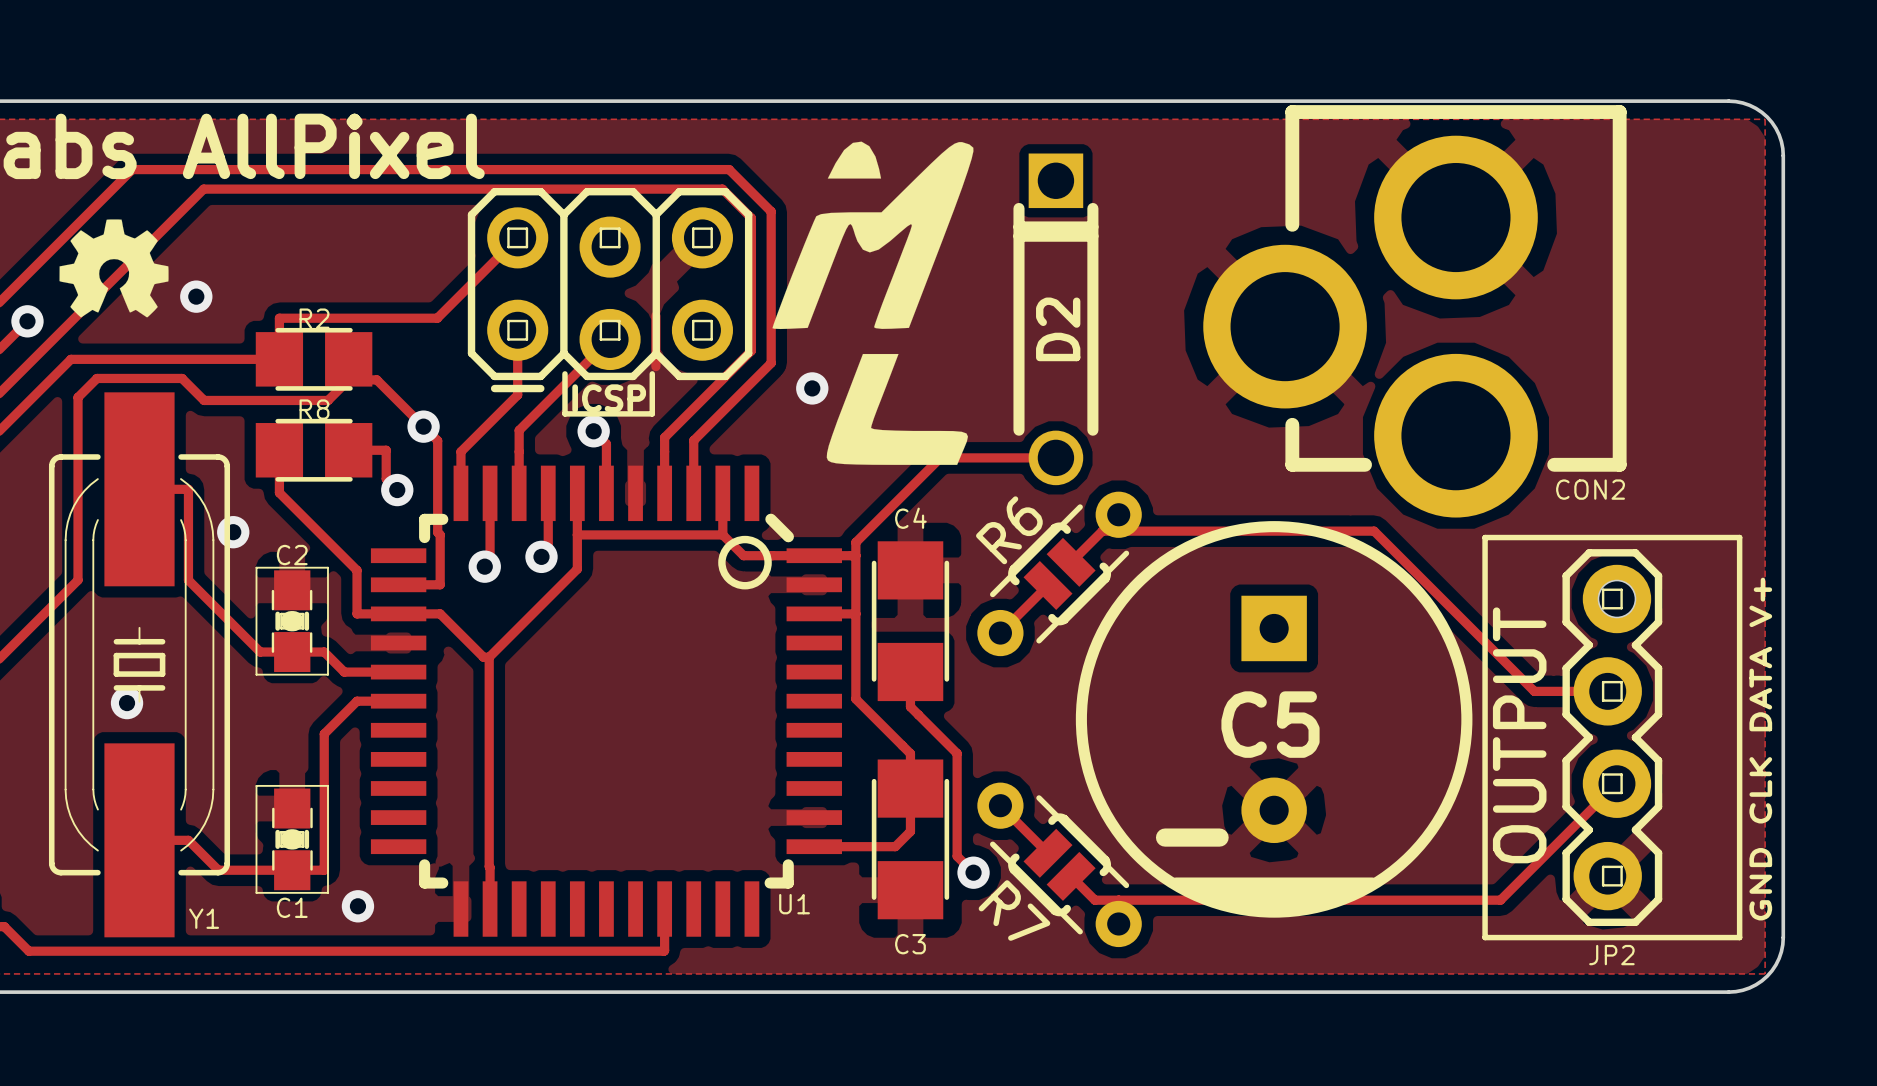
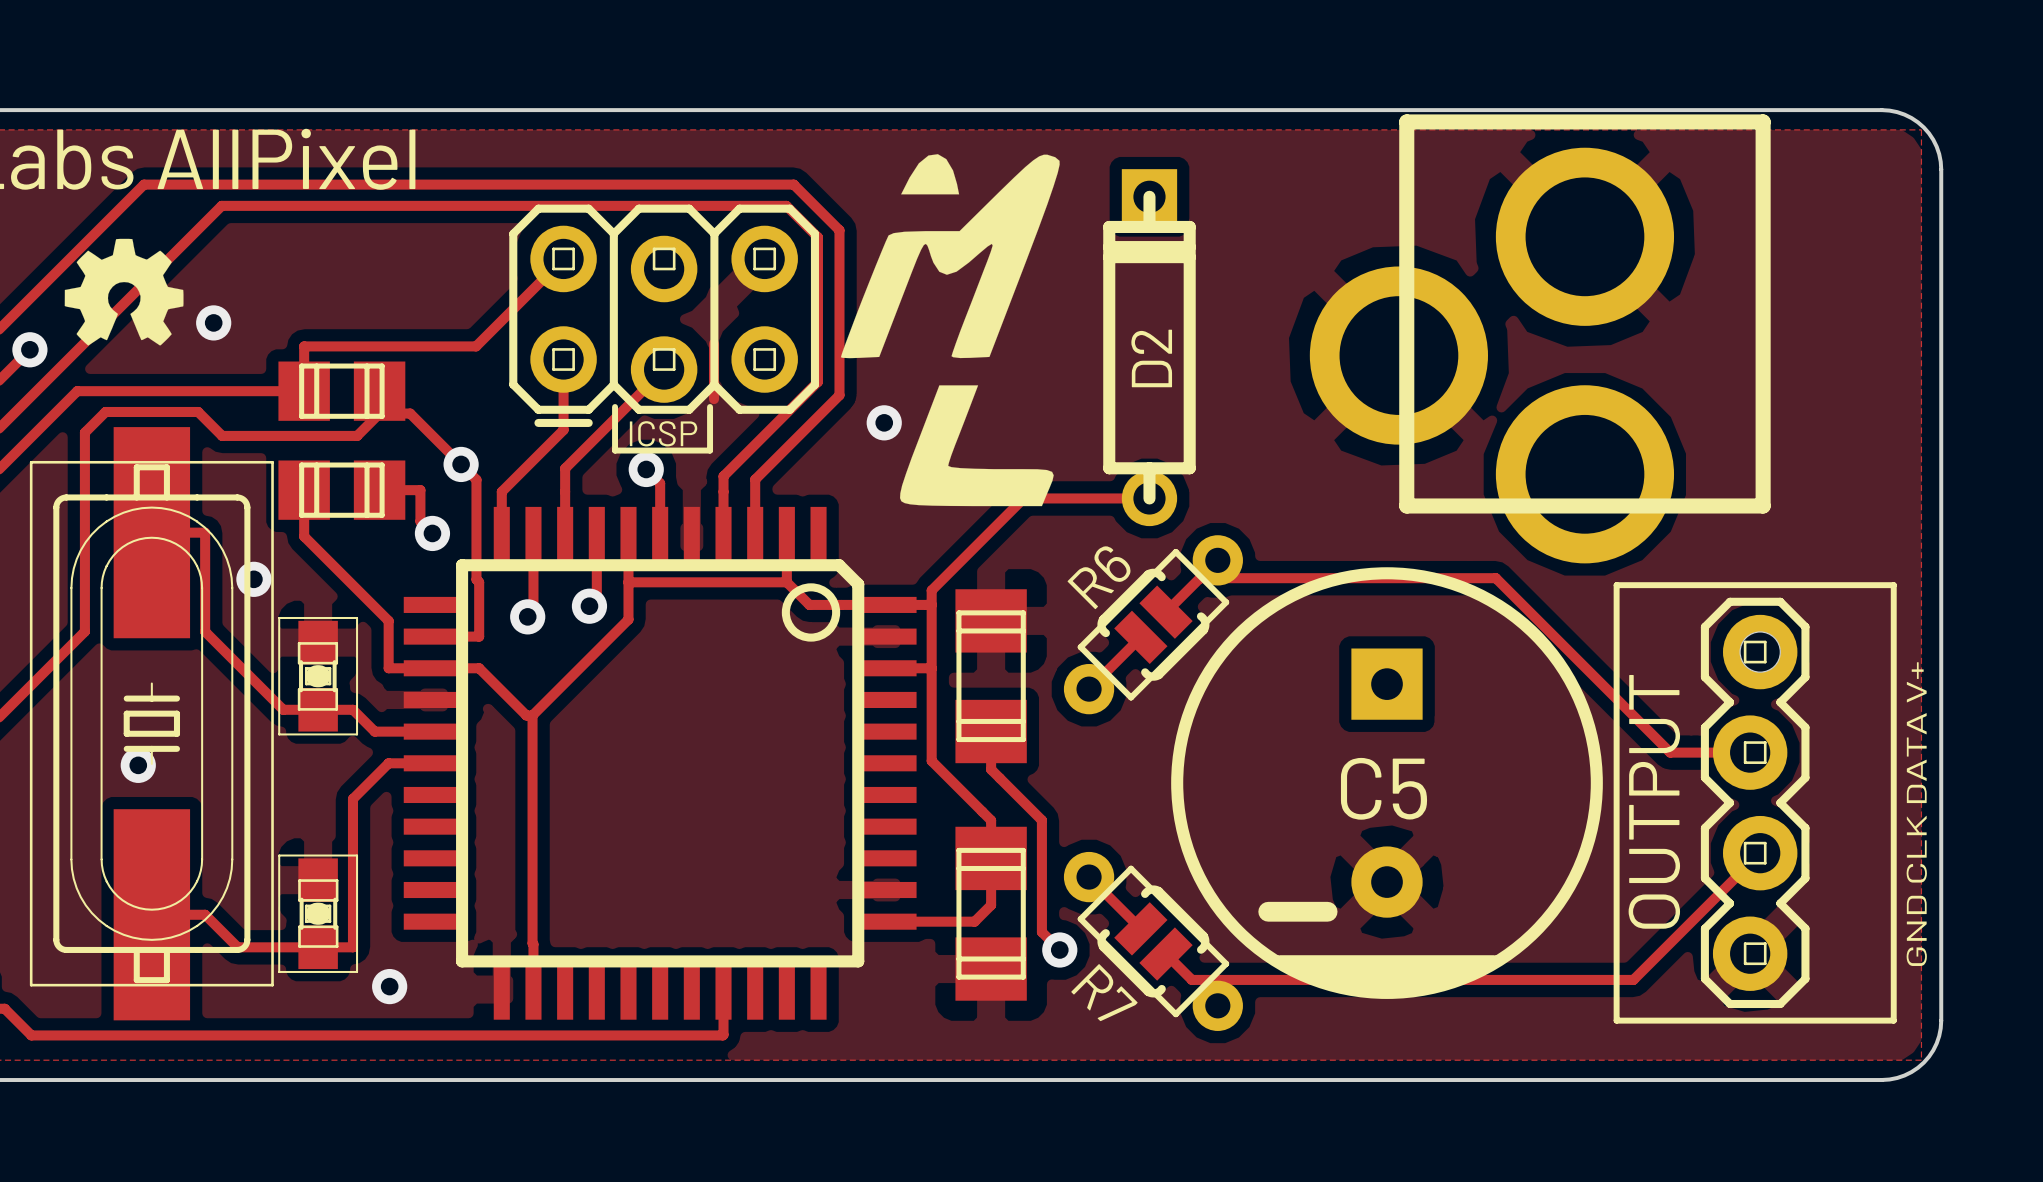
D2 footprint: [1013, 153, 1099, 486] -> [1103, 169, 1196, 527]
CON2: (1414, 311) -> none
part: none -> (1540, 338)
R2: (314, 359) -> none
part: none -> (341, 391)
R8: (314, 450) -> none
part: none -> (341, 490)
R6 footprint: [977, 491, 1142, 657] -> [1063, 535, 1243, 715]
C2: (292, 621) -> none
part: none -> (318, 676)
C4: (910, 621) -> none
part: none -> (991, 676)
Y1: (139, 664) -> none
part: none -> (151, 723)
U1: (606, 701) -> none
part: none -> (660, 763)
R7 footprint: [977, 782, 1142, 948] -> [1063, 851, 1243, 1031]
C1: (292, 839) -> none
part: none -> (318, 913)
C3: (910, 839) -> none
part: none -> (991, 913)
JP2 name: JP2 (1611, 955) -> none

